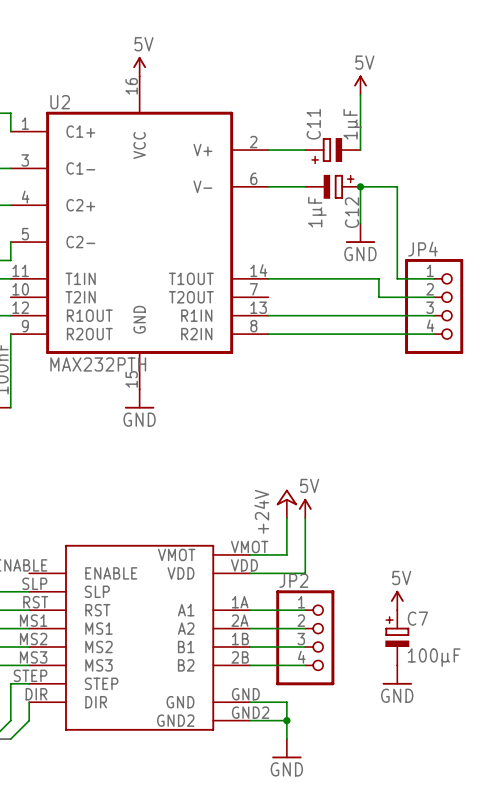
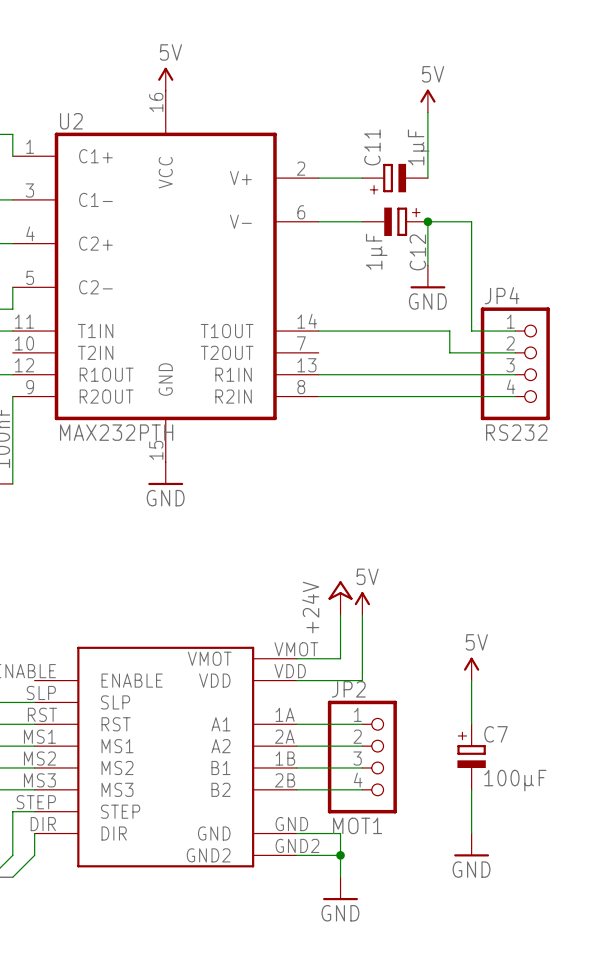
JP4 value: none -> RS232 (516, 432)
power symbol position: 5V (397, 600) -> 5V (471, 669)
power symbol position: GND (397, 675) -> GND (471, 845)
JP2 value: none -> MOT1 (357, 825)

